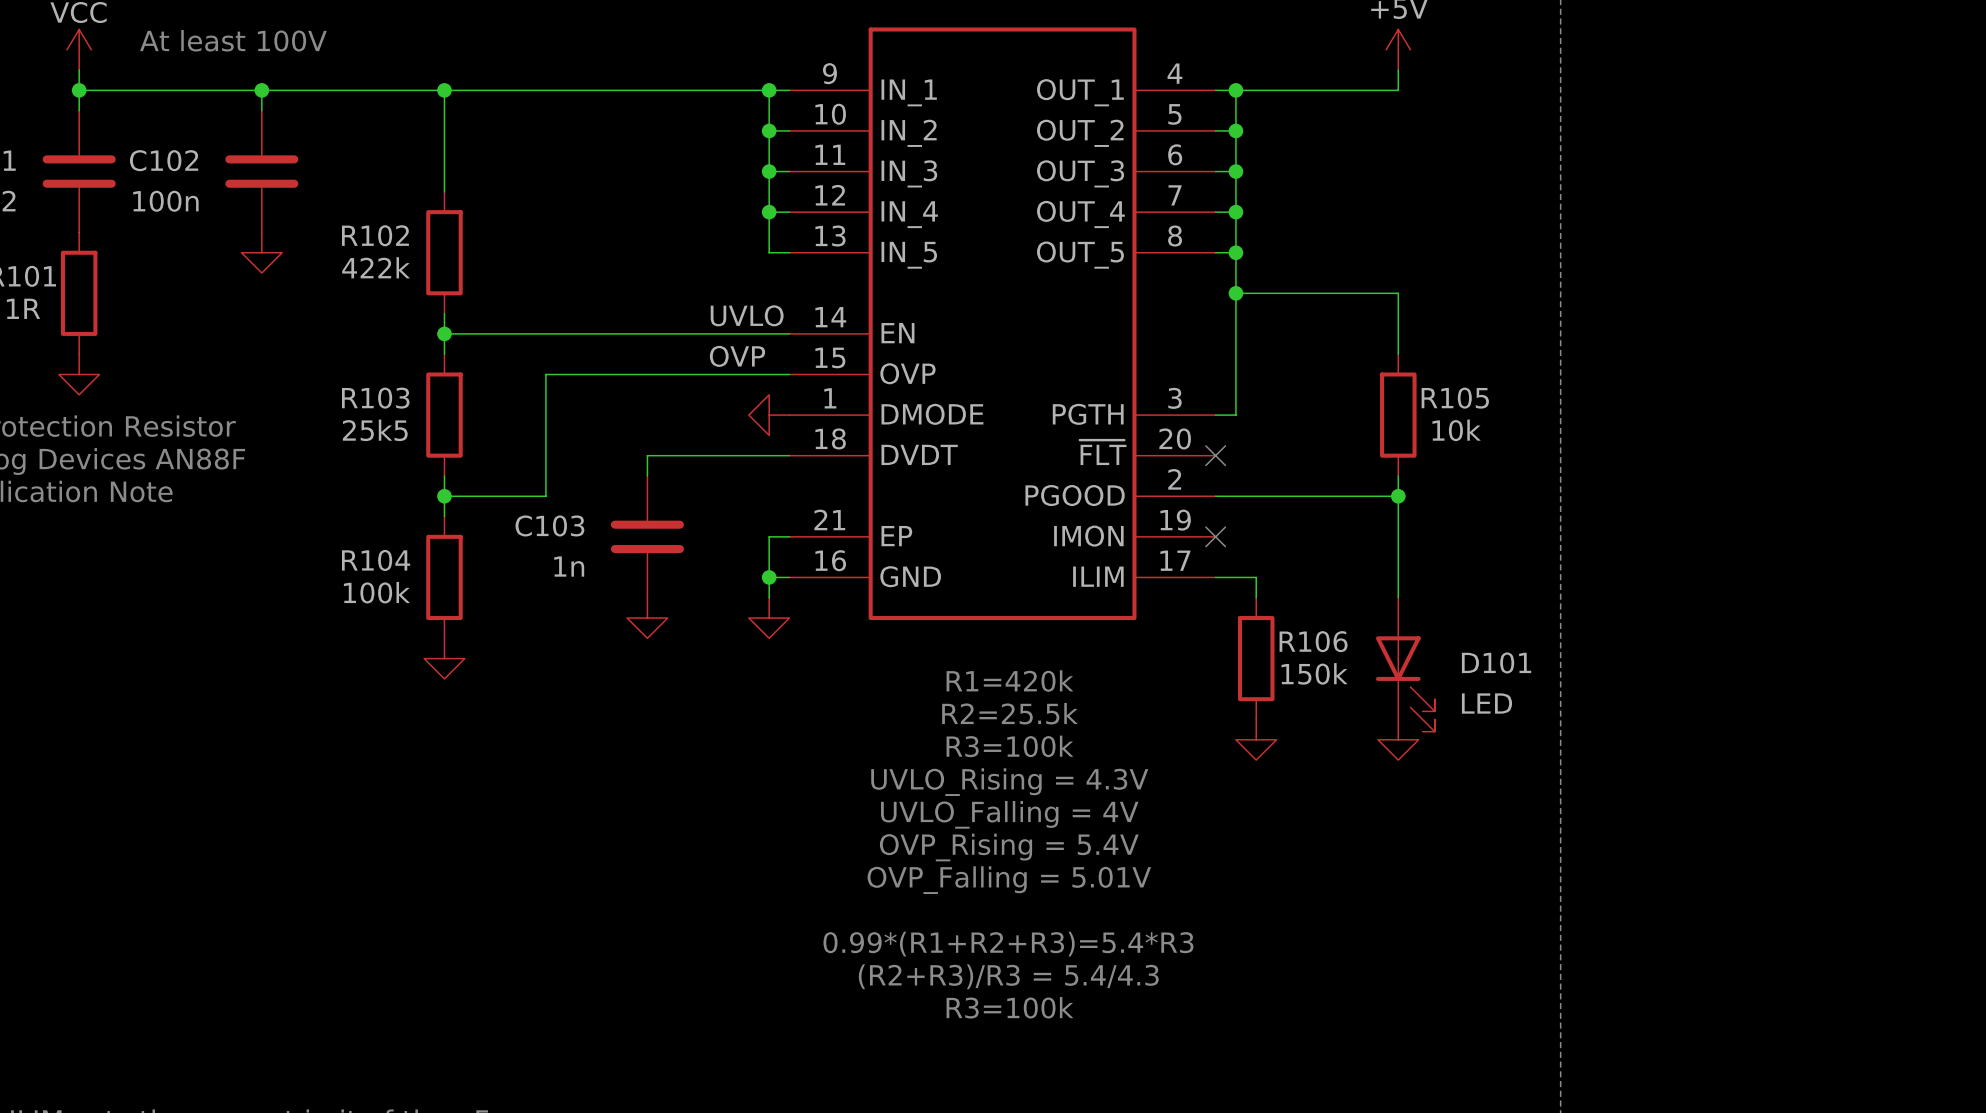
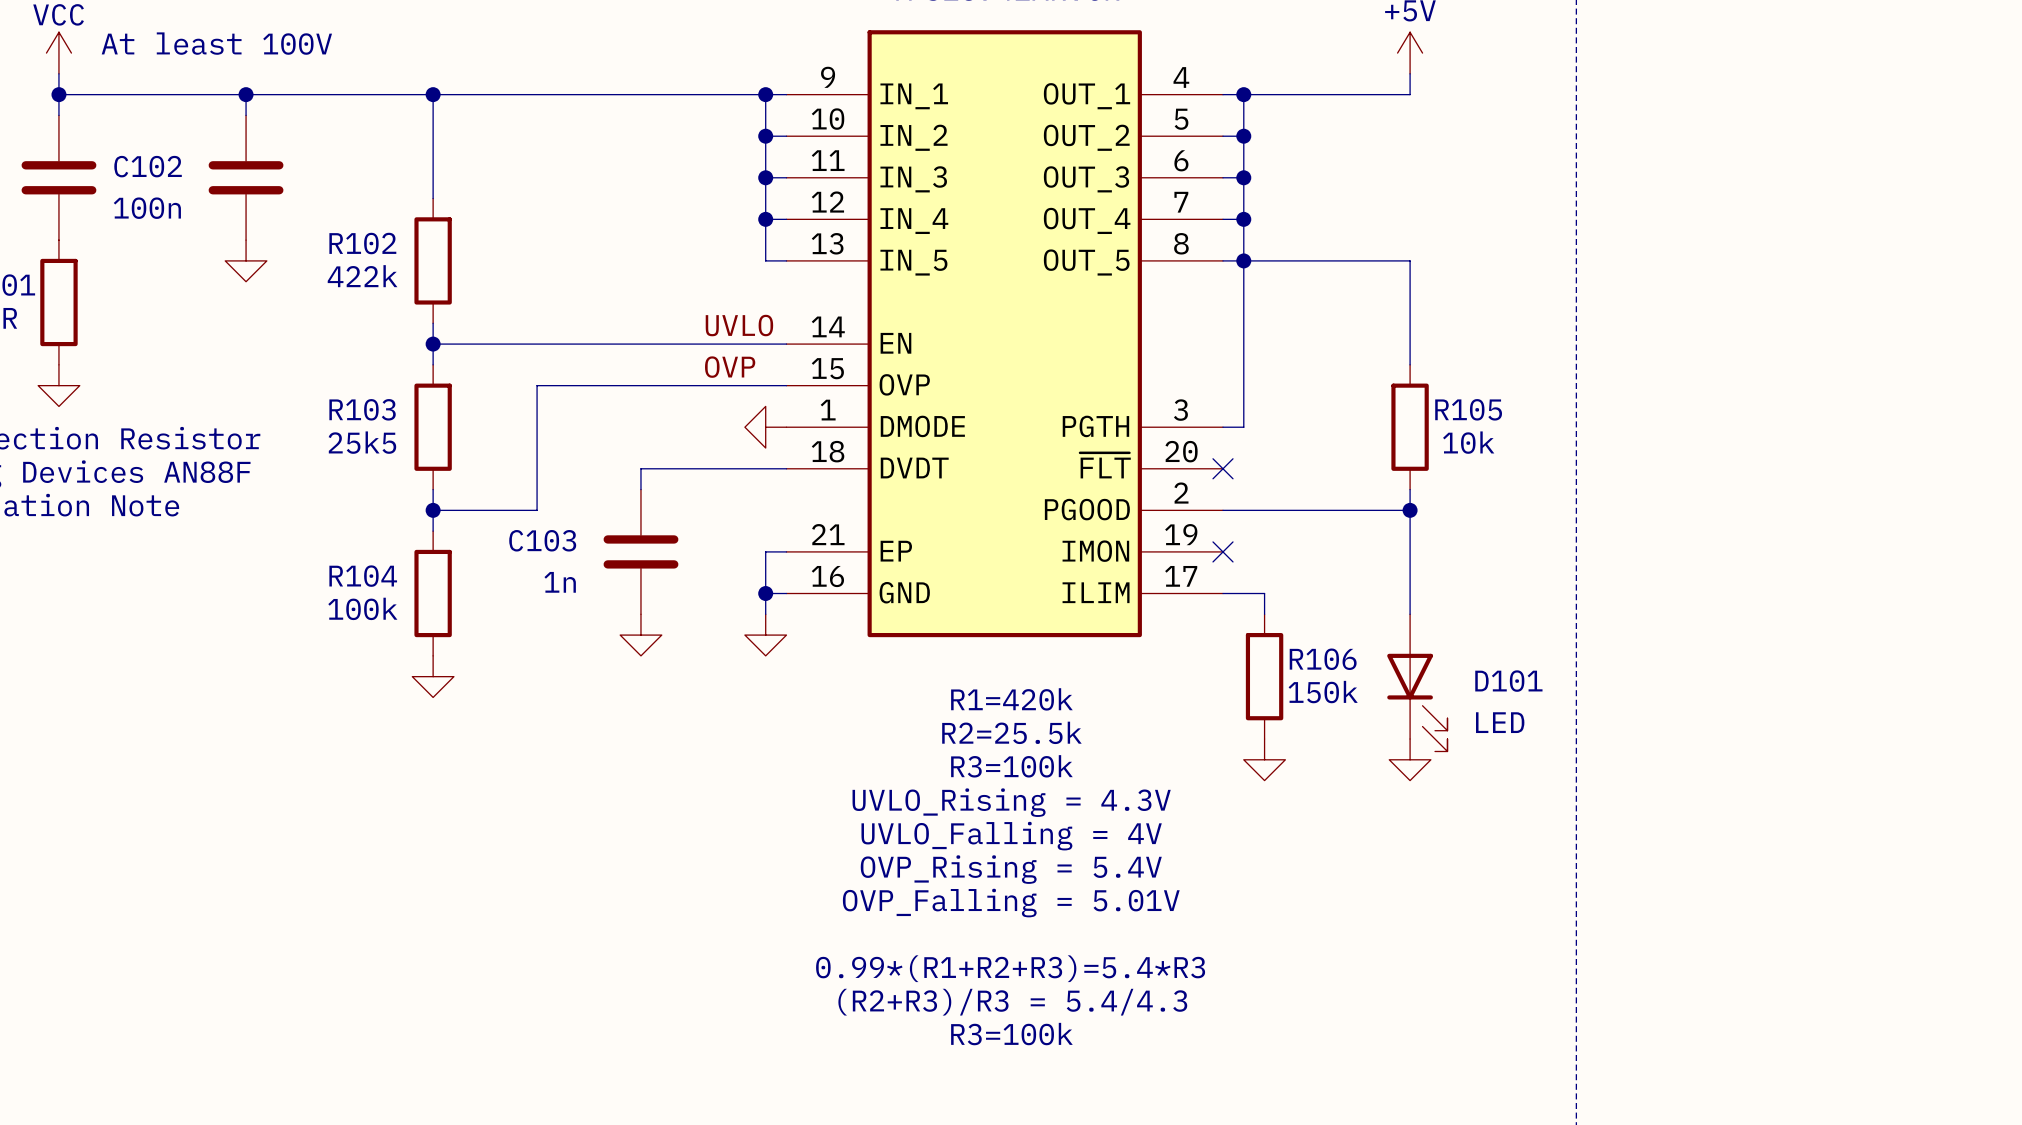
wire: (1235, 293) (1398, 293) -> (1243, 260) (1410, 260) (1410, 302)
junction: (1235, 293) -> none

